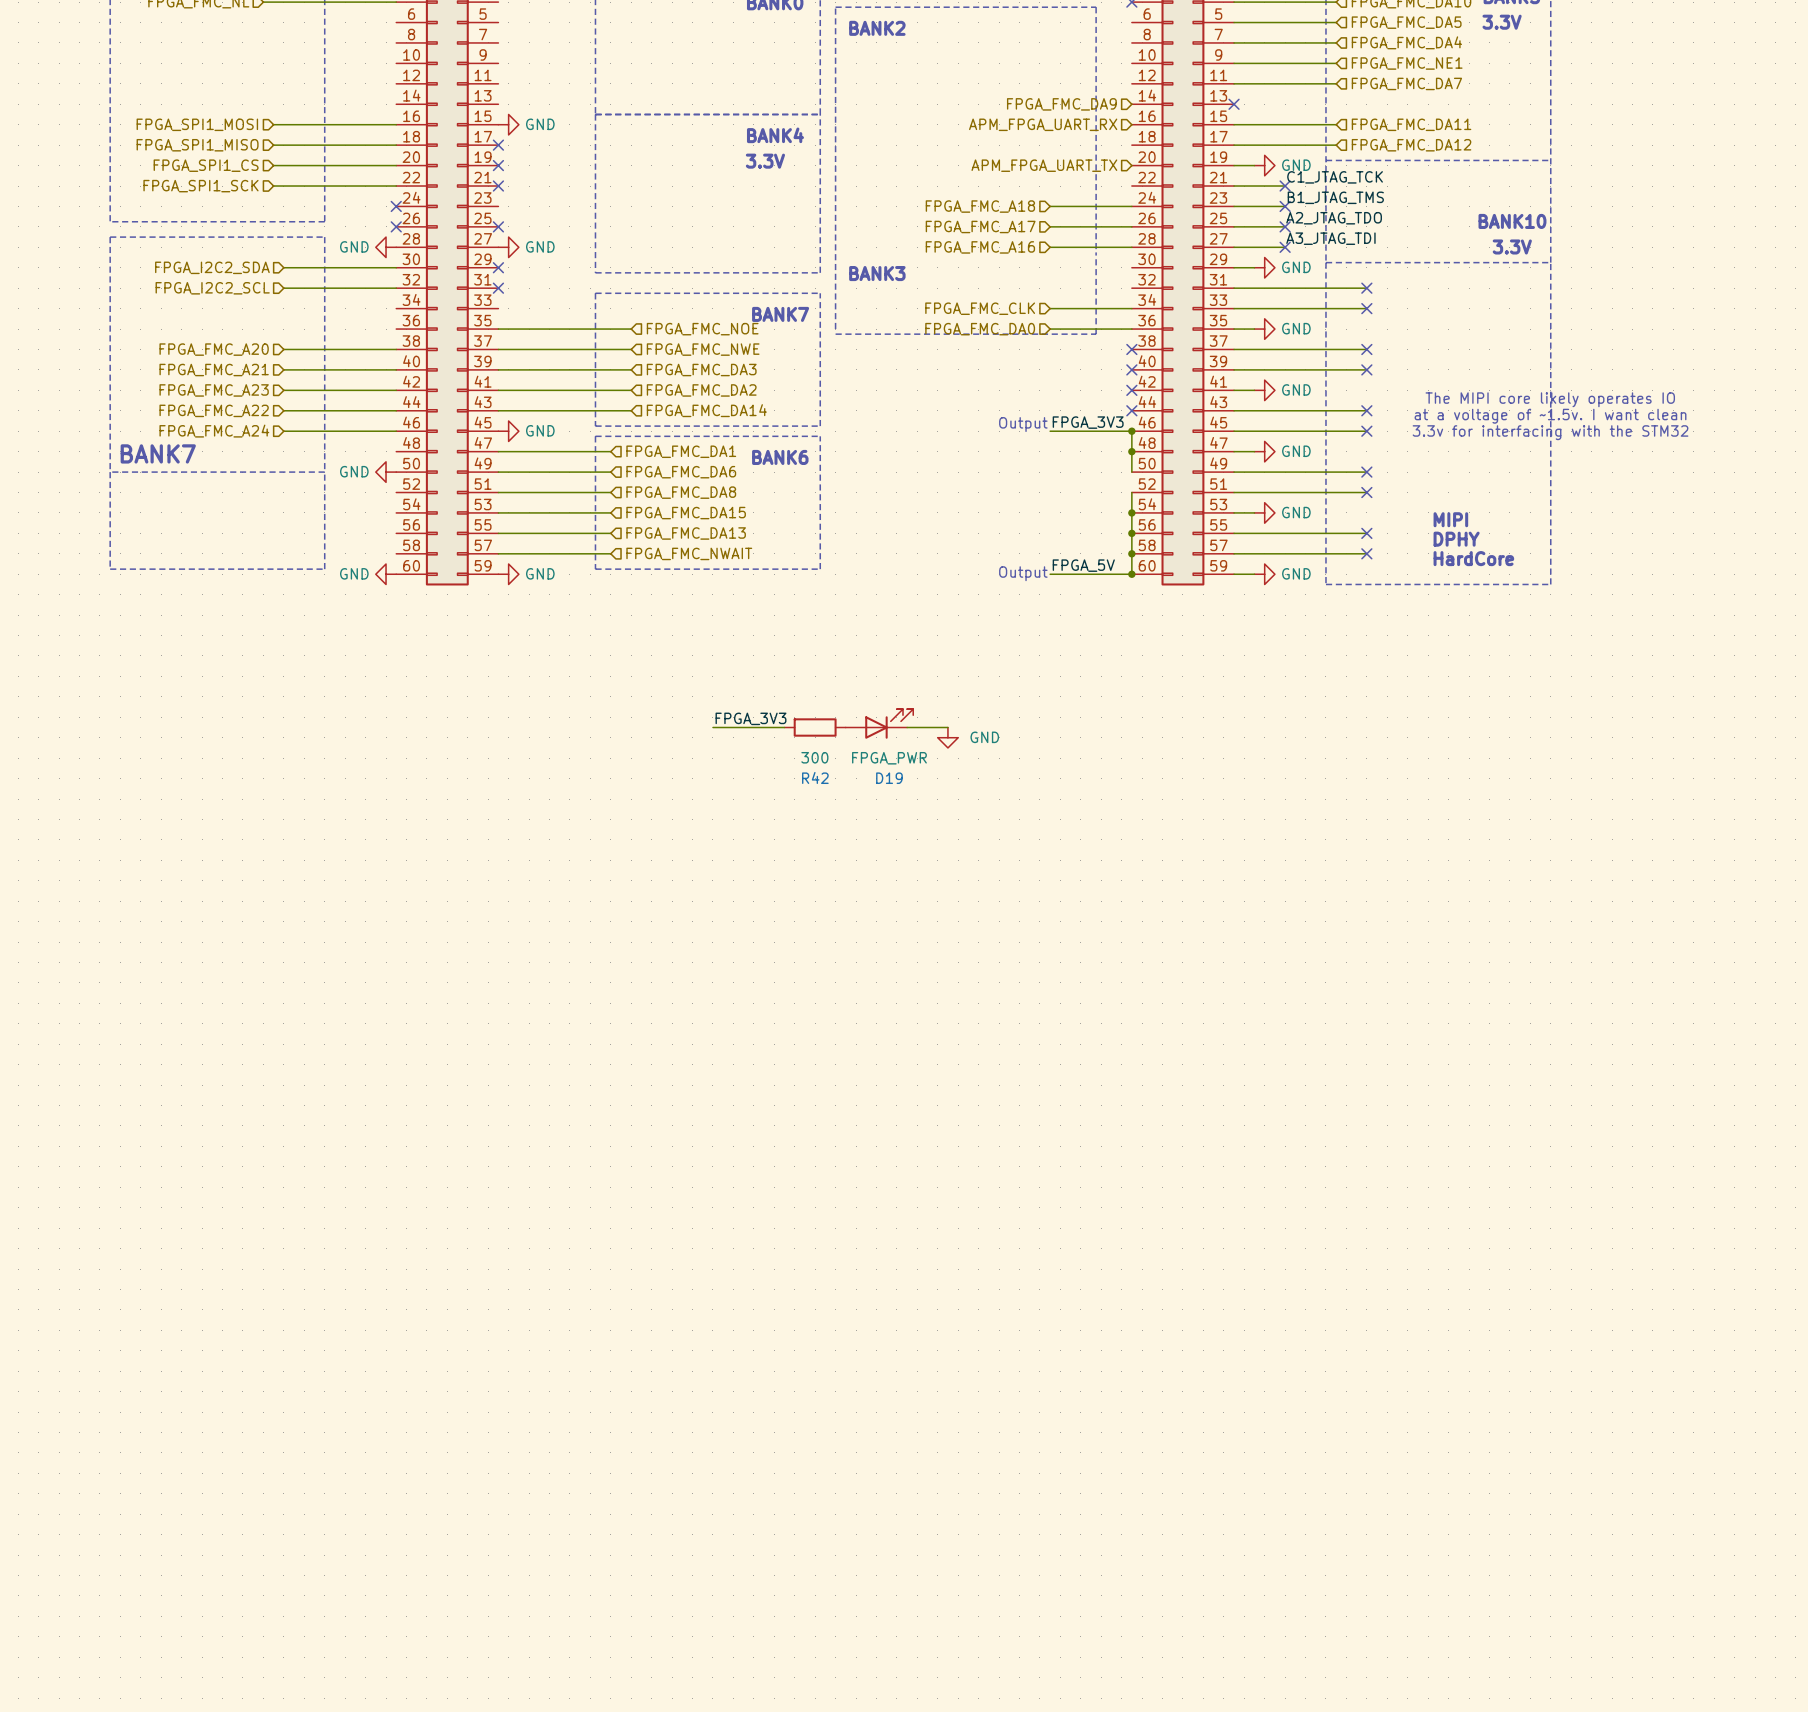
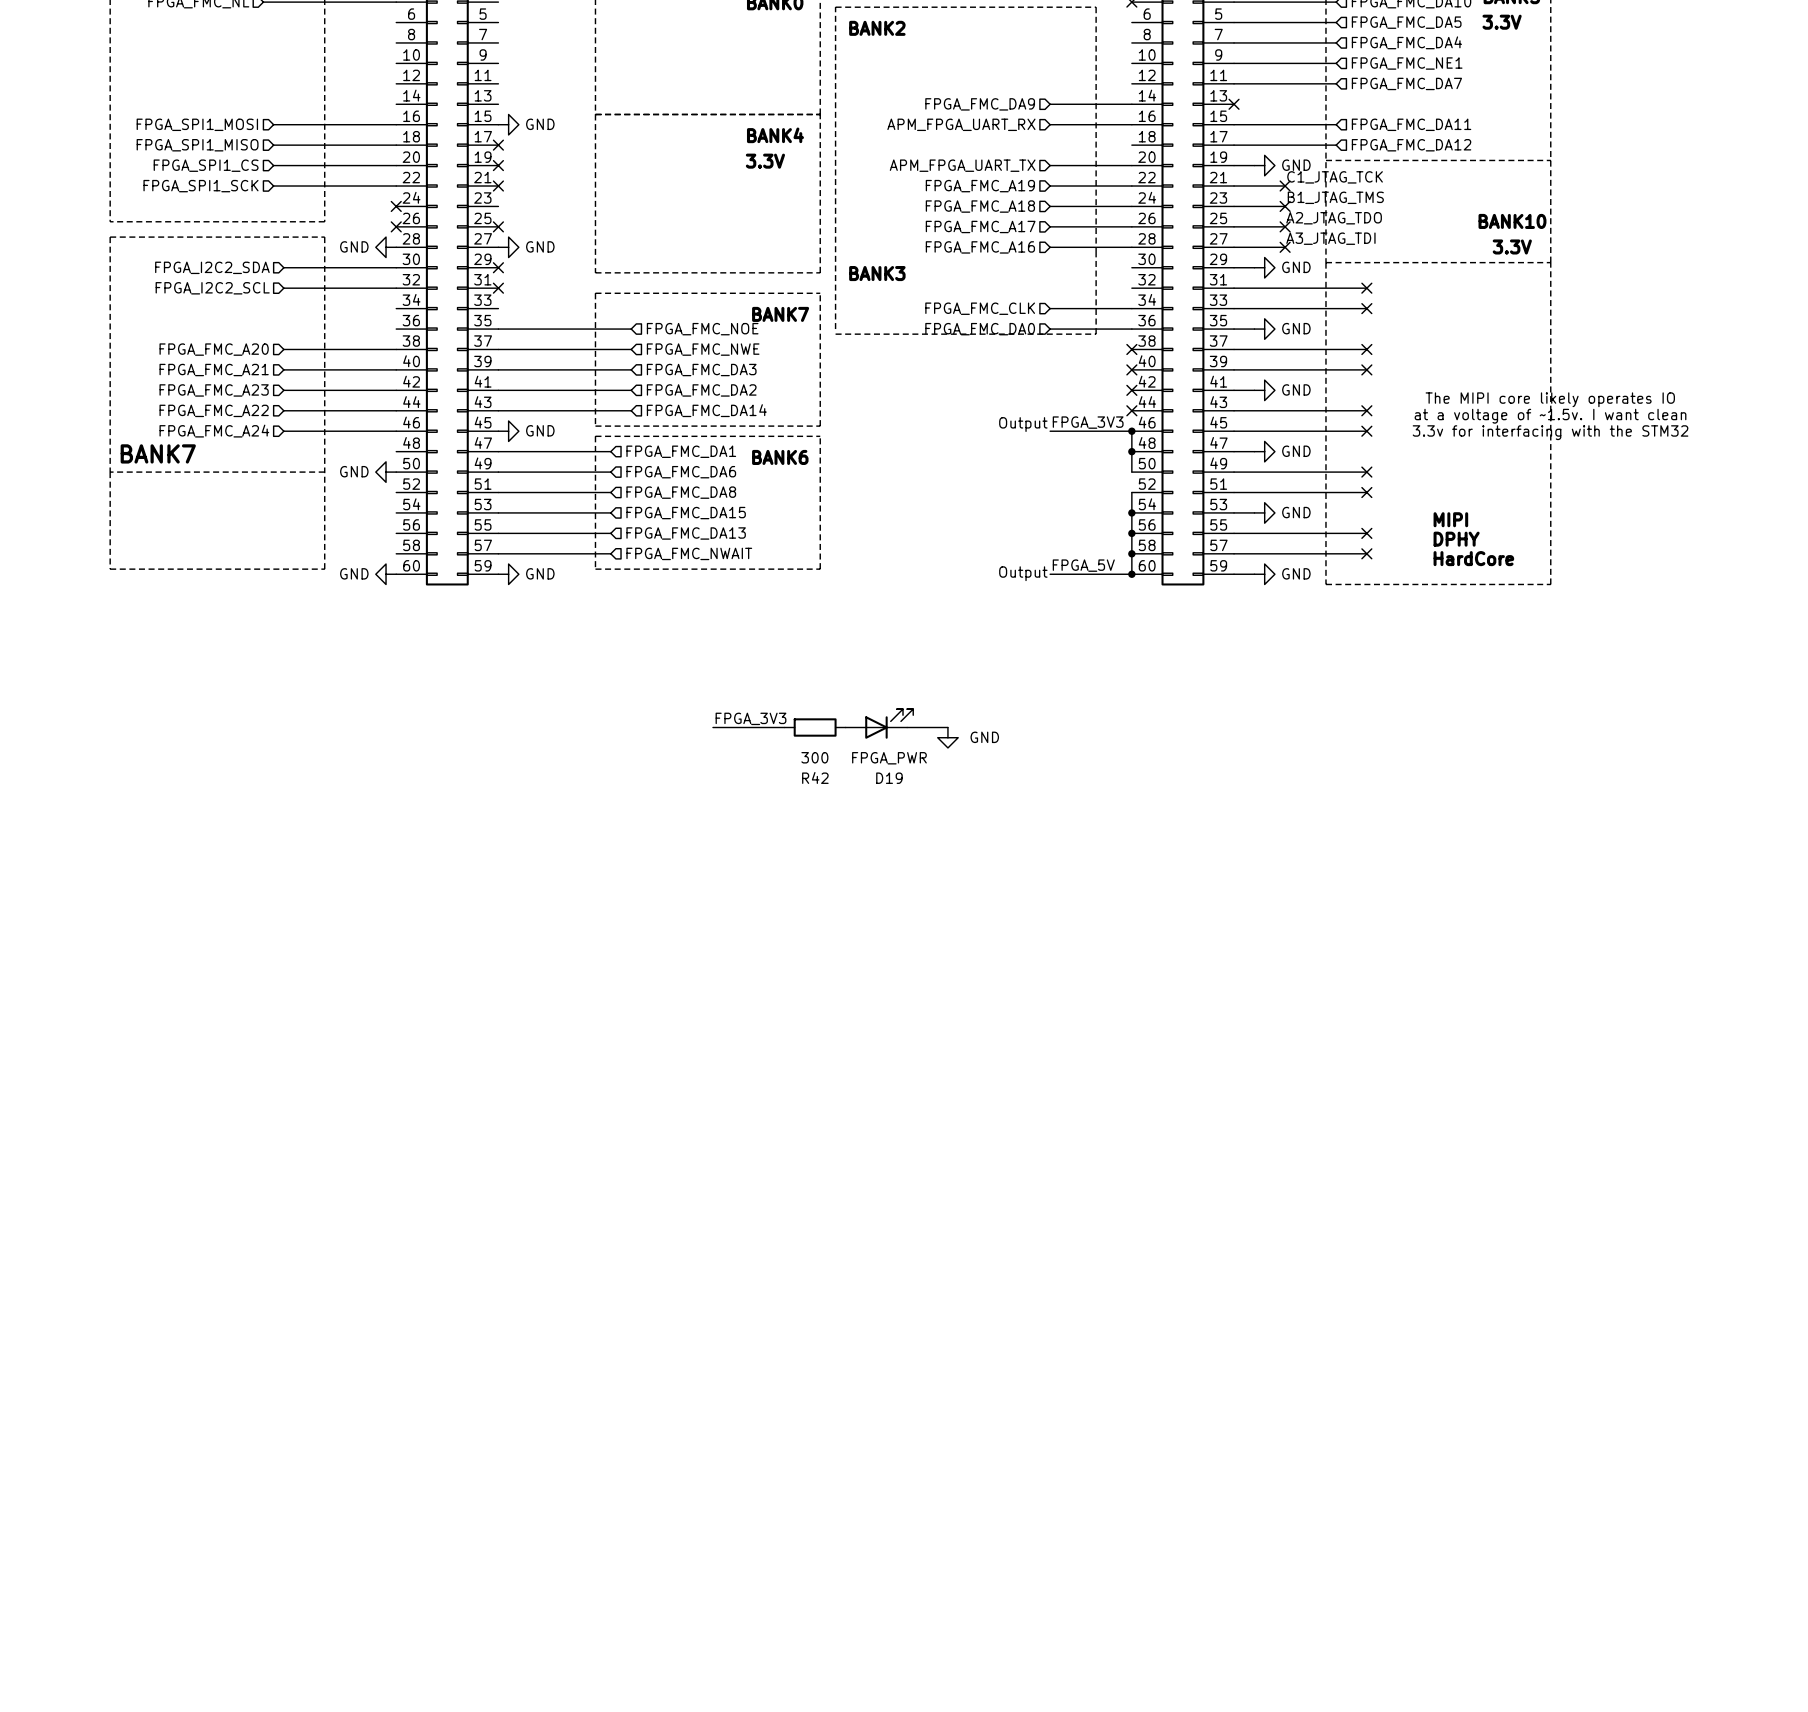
wire: none -> (1050, 104) (1131, 104)
hierarchical label position: FPGA_FMC_DA9 (1061, 104) -> FPGA_FMC_DA9 (980, 104)
hierarchical label position: APM_FPGA_UART_RX (1043, 124) -> APM_FPGA_UART_RX (961, 124)
wire: none -> (1050, 124) (1131, 124)
hierarchical label position: APM_FPGA_UART_TX (1044, 165) -> APM_FPGA_UART_TX (962, 165)
wire: none -> (1050, 165) (1131, 165)
hierarchical label: none -> FPGA_FMC_A19 (980, 186)
wire: none -> (1050, 186) (1131, 186)

